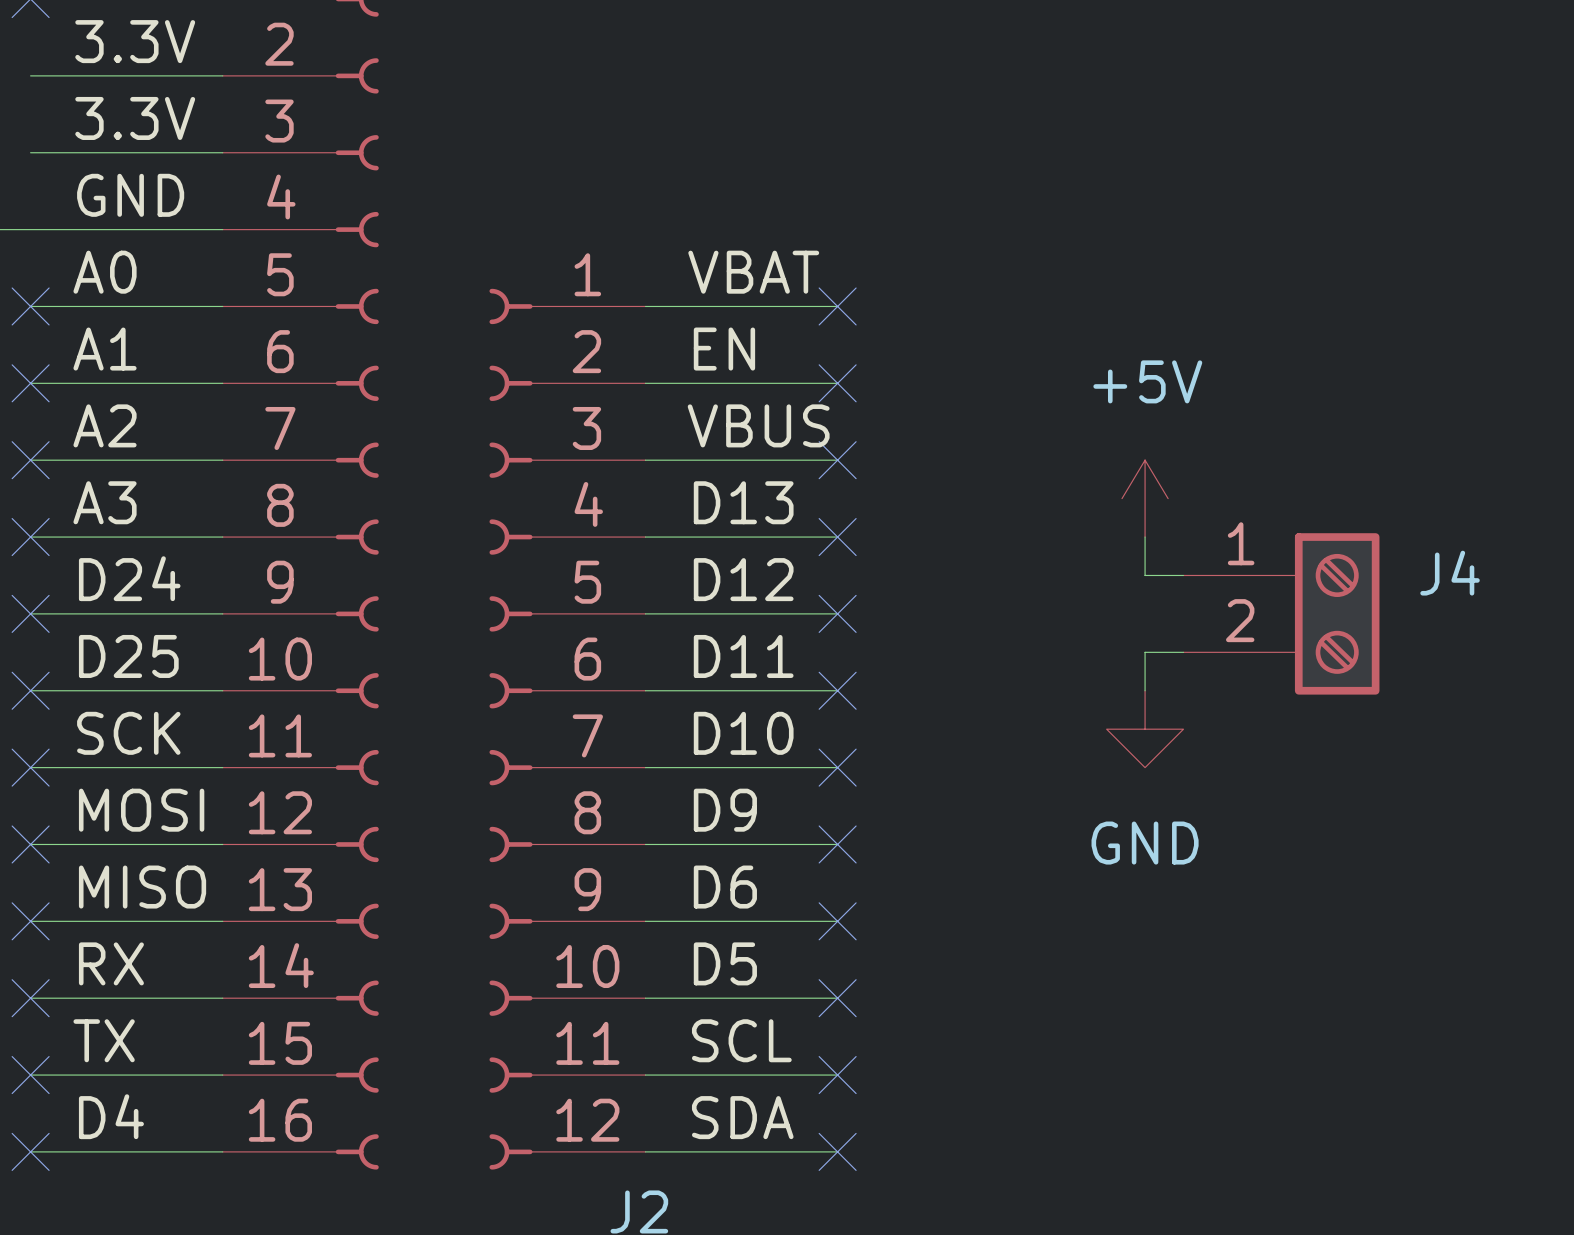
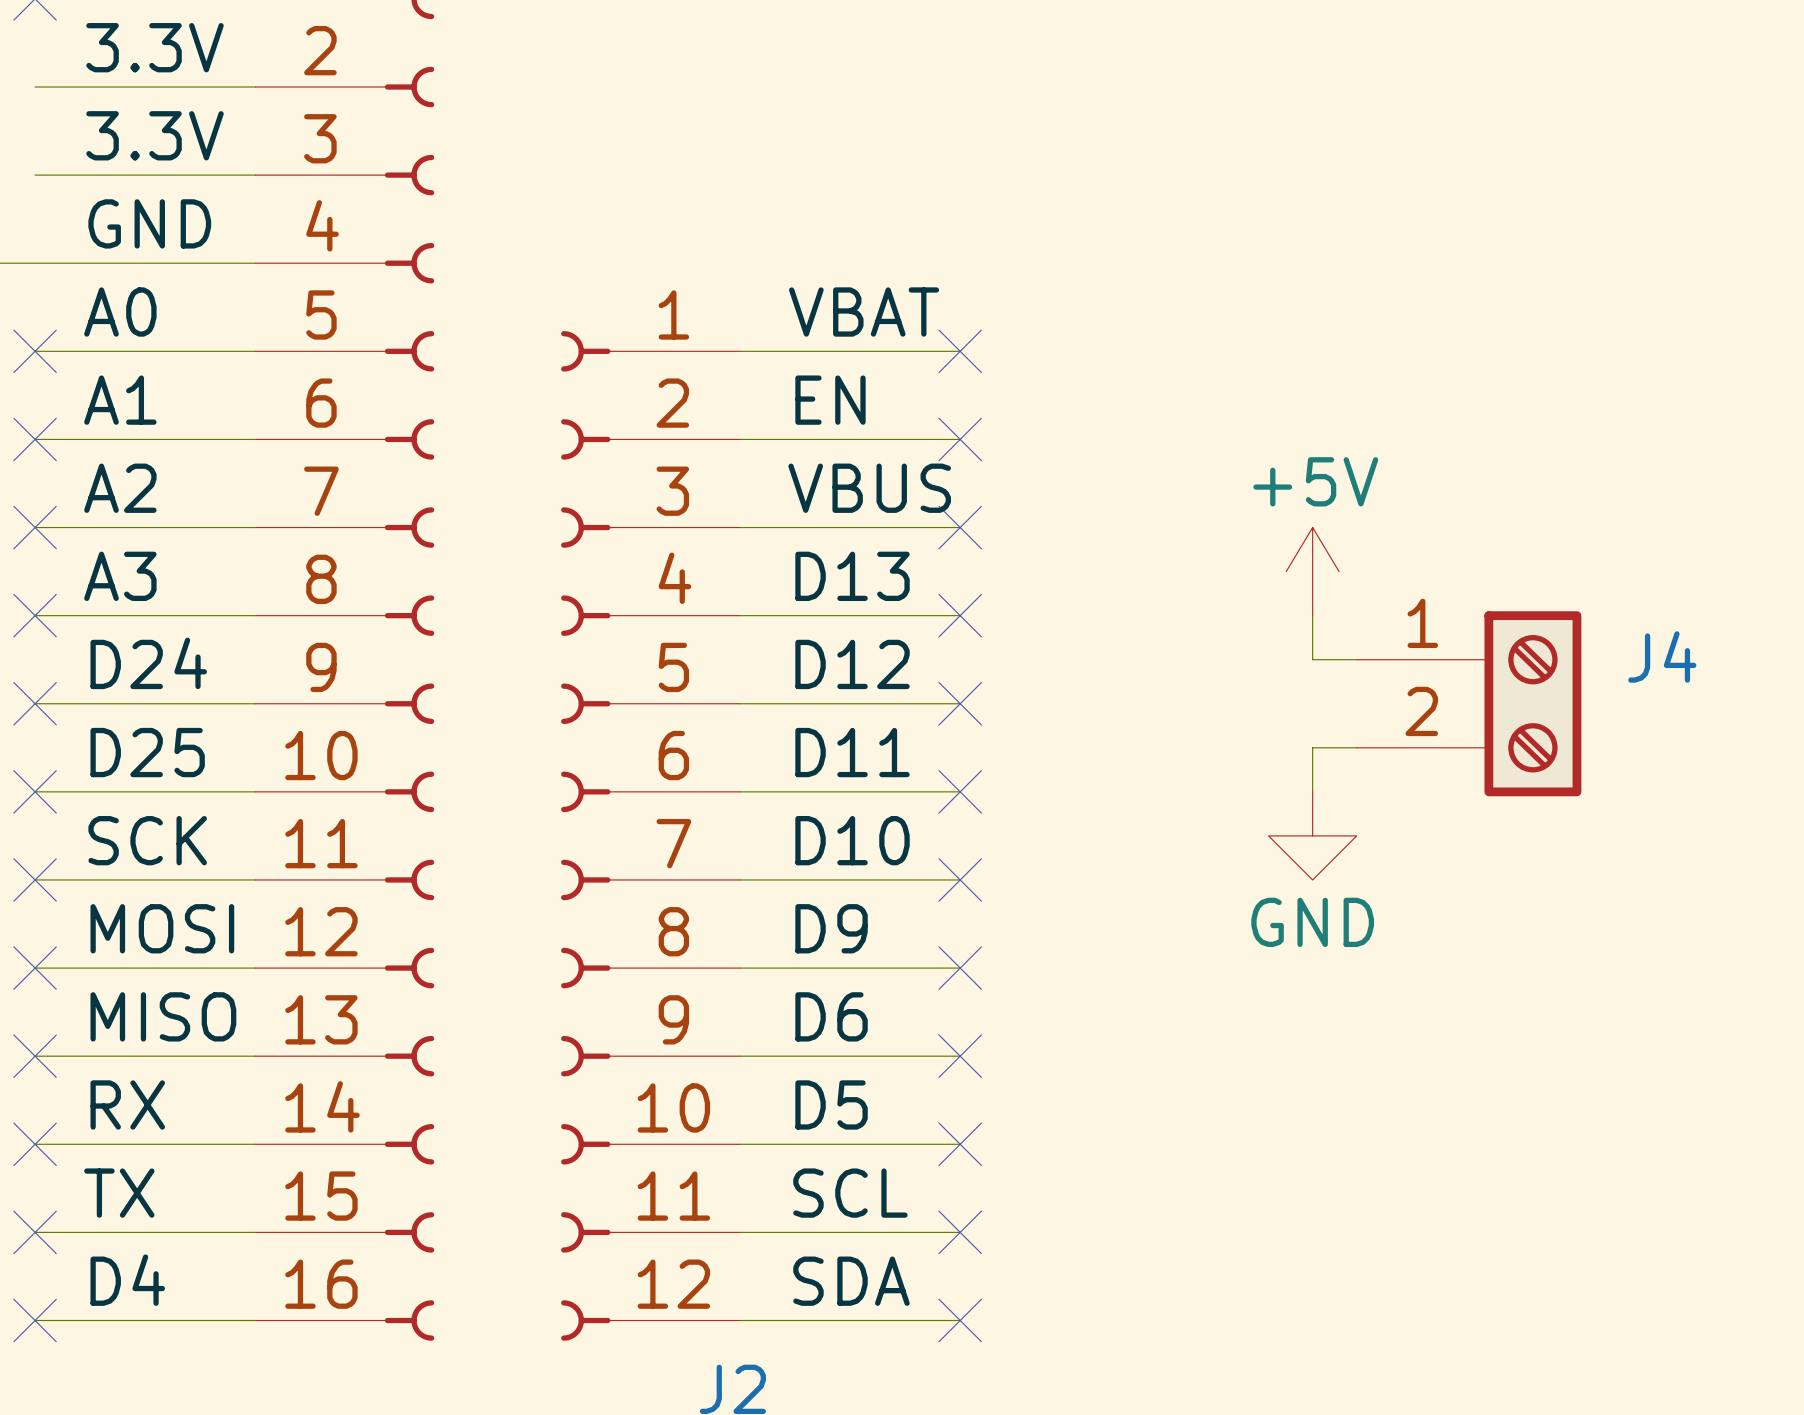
power symbol text position: +5V (1147, 381) -> +5V (1315, 481)
power symbol text position: GND (1145, 843) -> GND (1312, 922)

